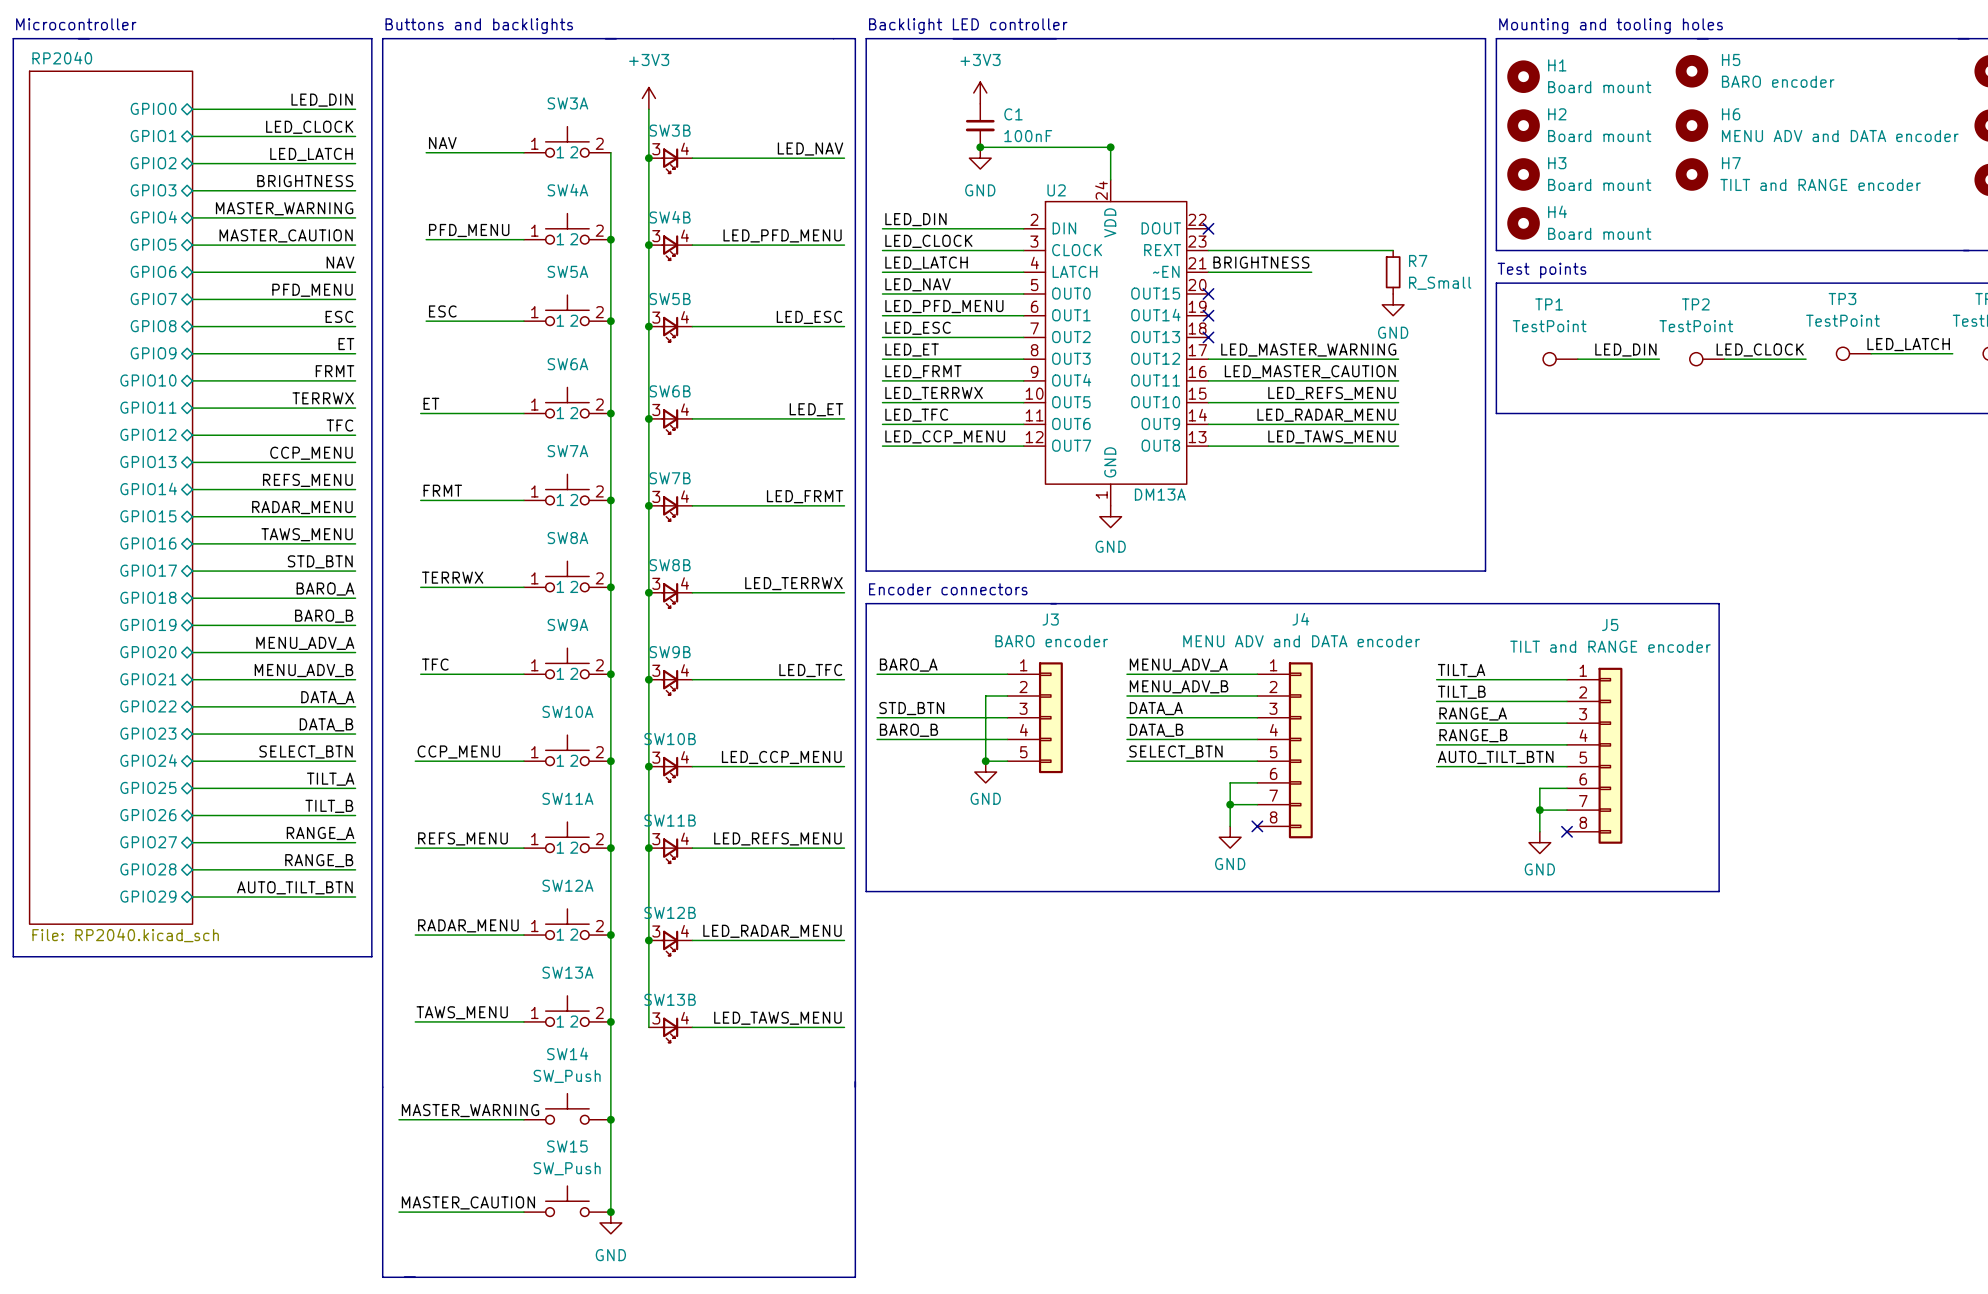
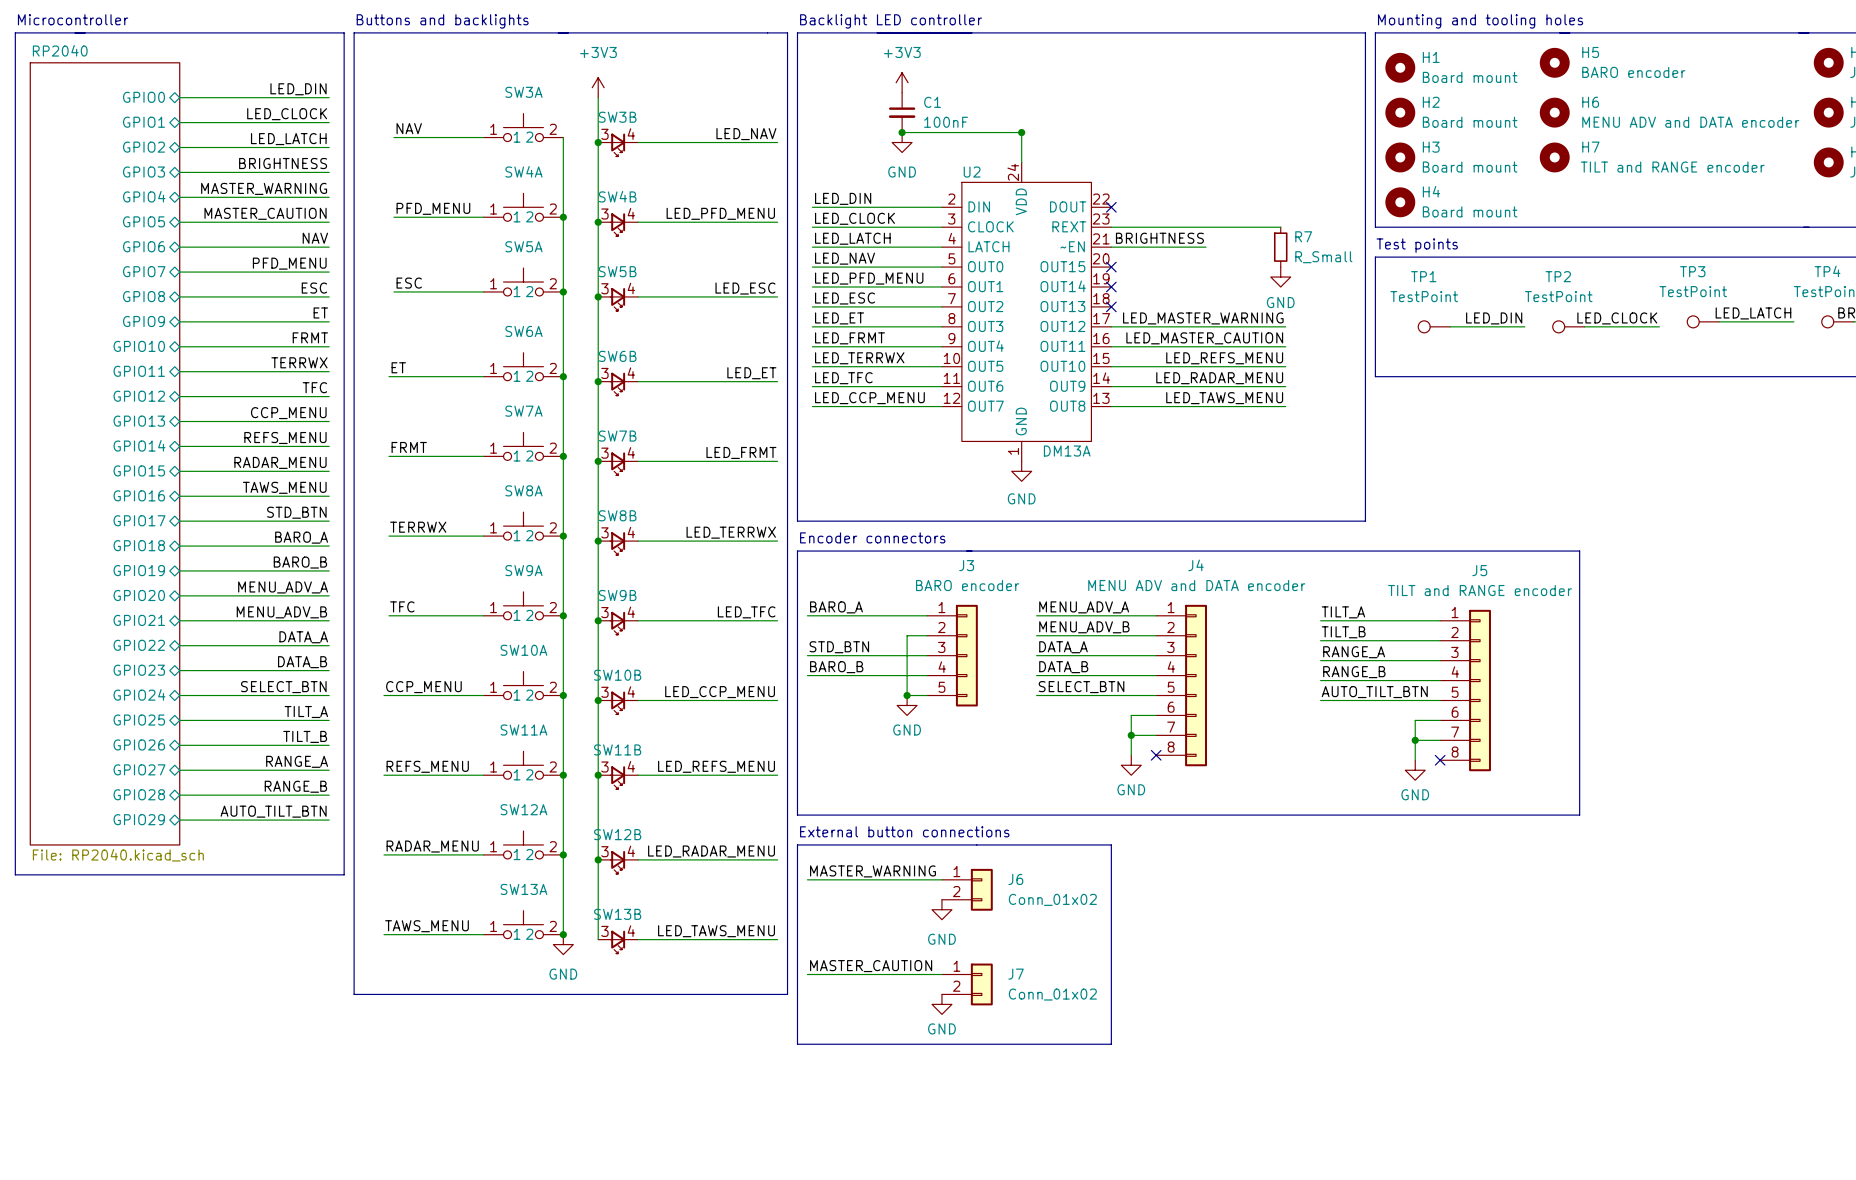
text: none -> External button connections (904, 831)
line: none -> (797, 844) (797, 1044) (1111, 1044) (1111, 844) (797, 844)
label: none -> MASTER_WARNING (873, 871)
wire: none -> (807, 879) (941, 879)
J6: none -> Conn_01x02 (967, 889)
power symbol: none -> GND (941, 909)
wire: (610, 1021) (610, 1212) -> none
label: none -> MASTER_CAUTION (871, 966)
wire: none -> (807, 974) (941, 974)
J7: none -> Conn_01x02 (967, 984)
line: (382, 1087) (382, 1277) (855, 1277) (855, 1087) -> (354, 994) (787, 994)
power symbol: none -> GND (941, 1004)
SW14: SW_Push (567, 1108) -> none
label: MASTER_WARNING (470, 1110) -> none
wire: (399, 1119) (523, 1119) -> none
junction: (610, 1119) -> none
SW15: SW_Push (567, 1201) -> none
label: MASTER_CAUTION (468, 1202) -> none
wire: (399, 1212) (523, 1212) -> none
junction: (610, 1212) -> none
power symbol position: GND (610, 1222) -> GND (563, 944)

